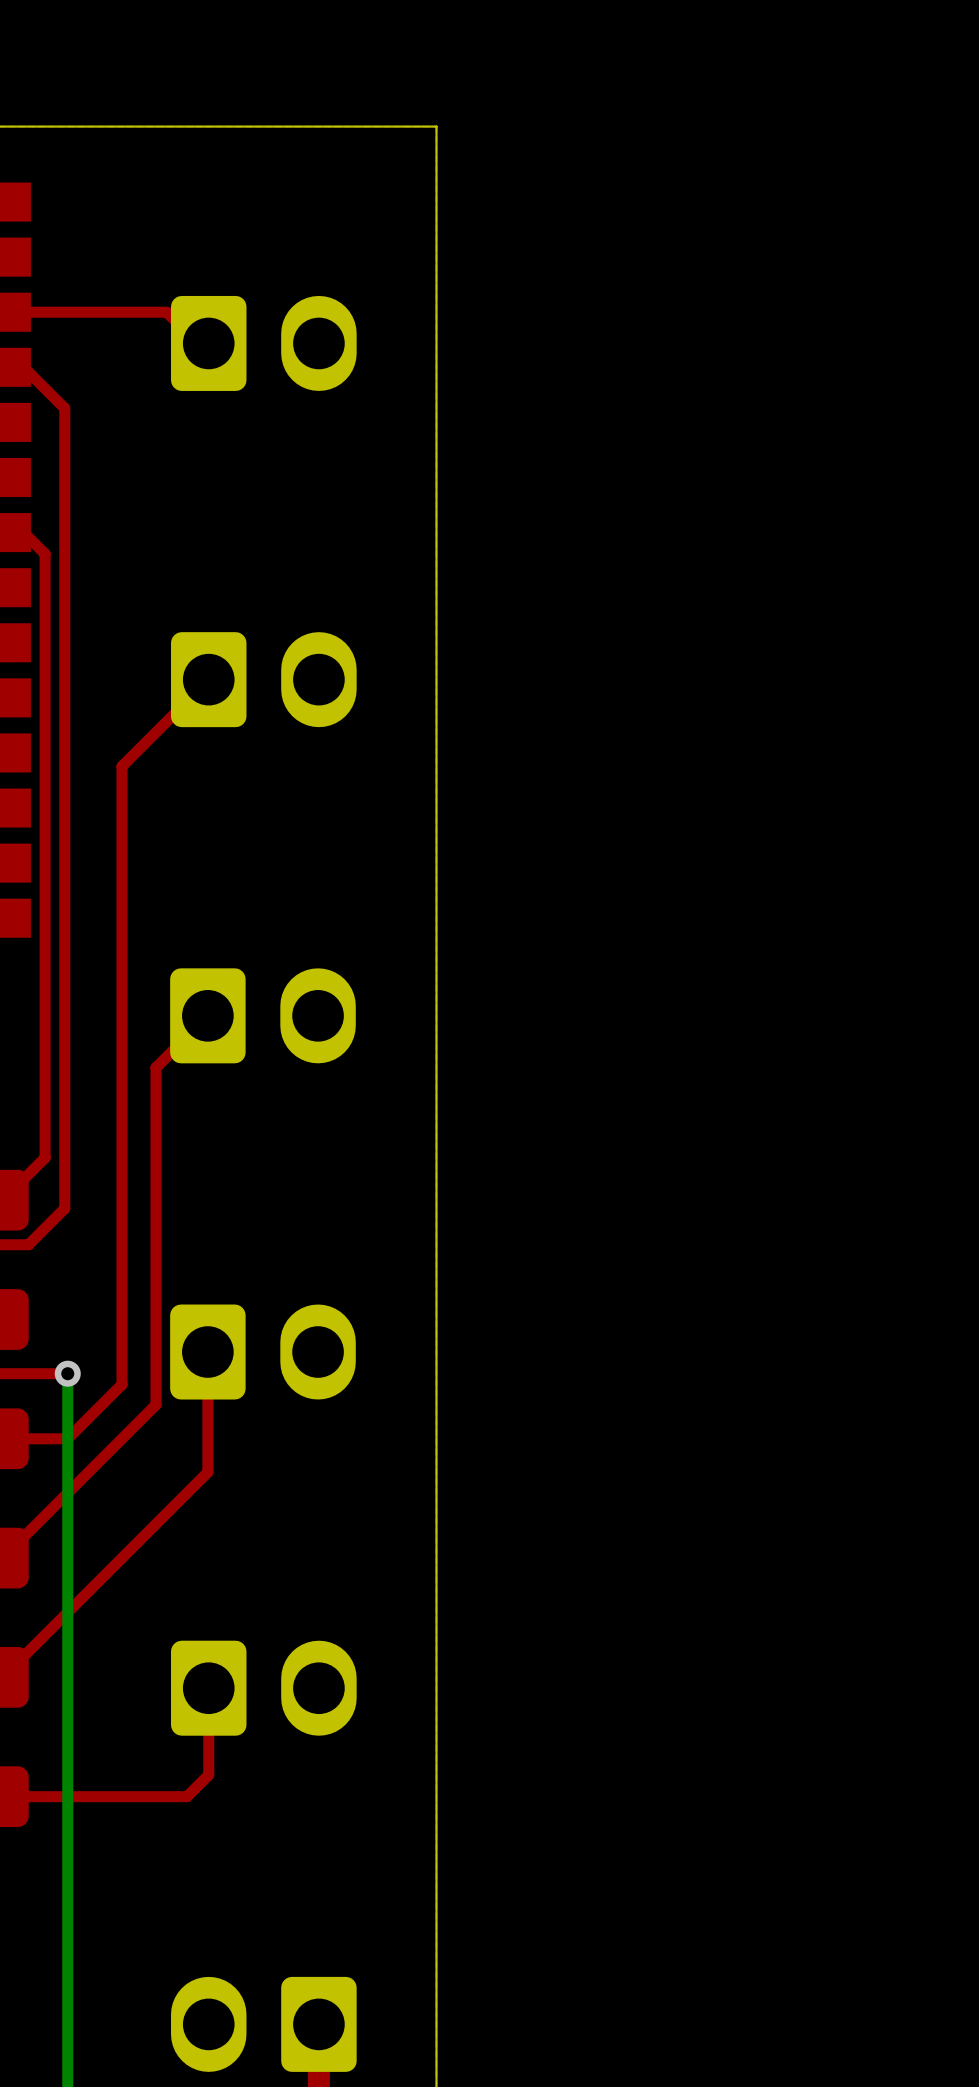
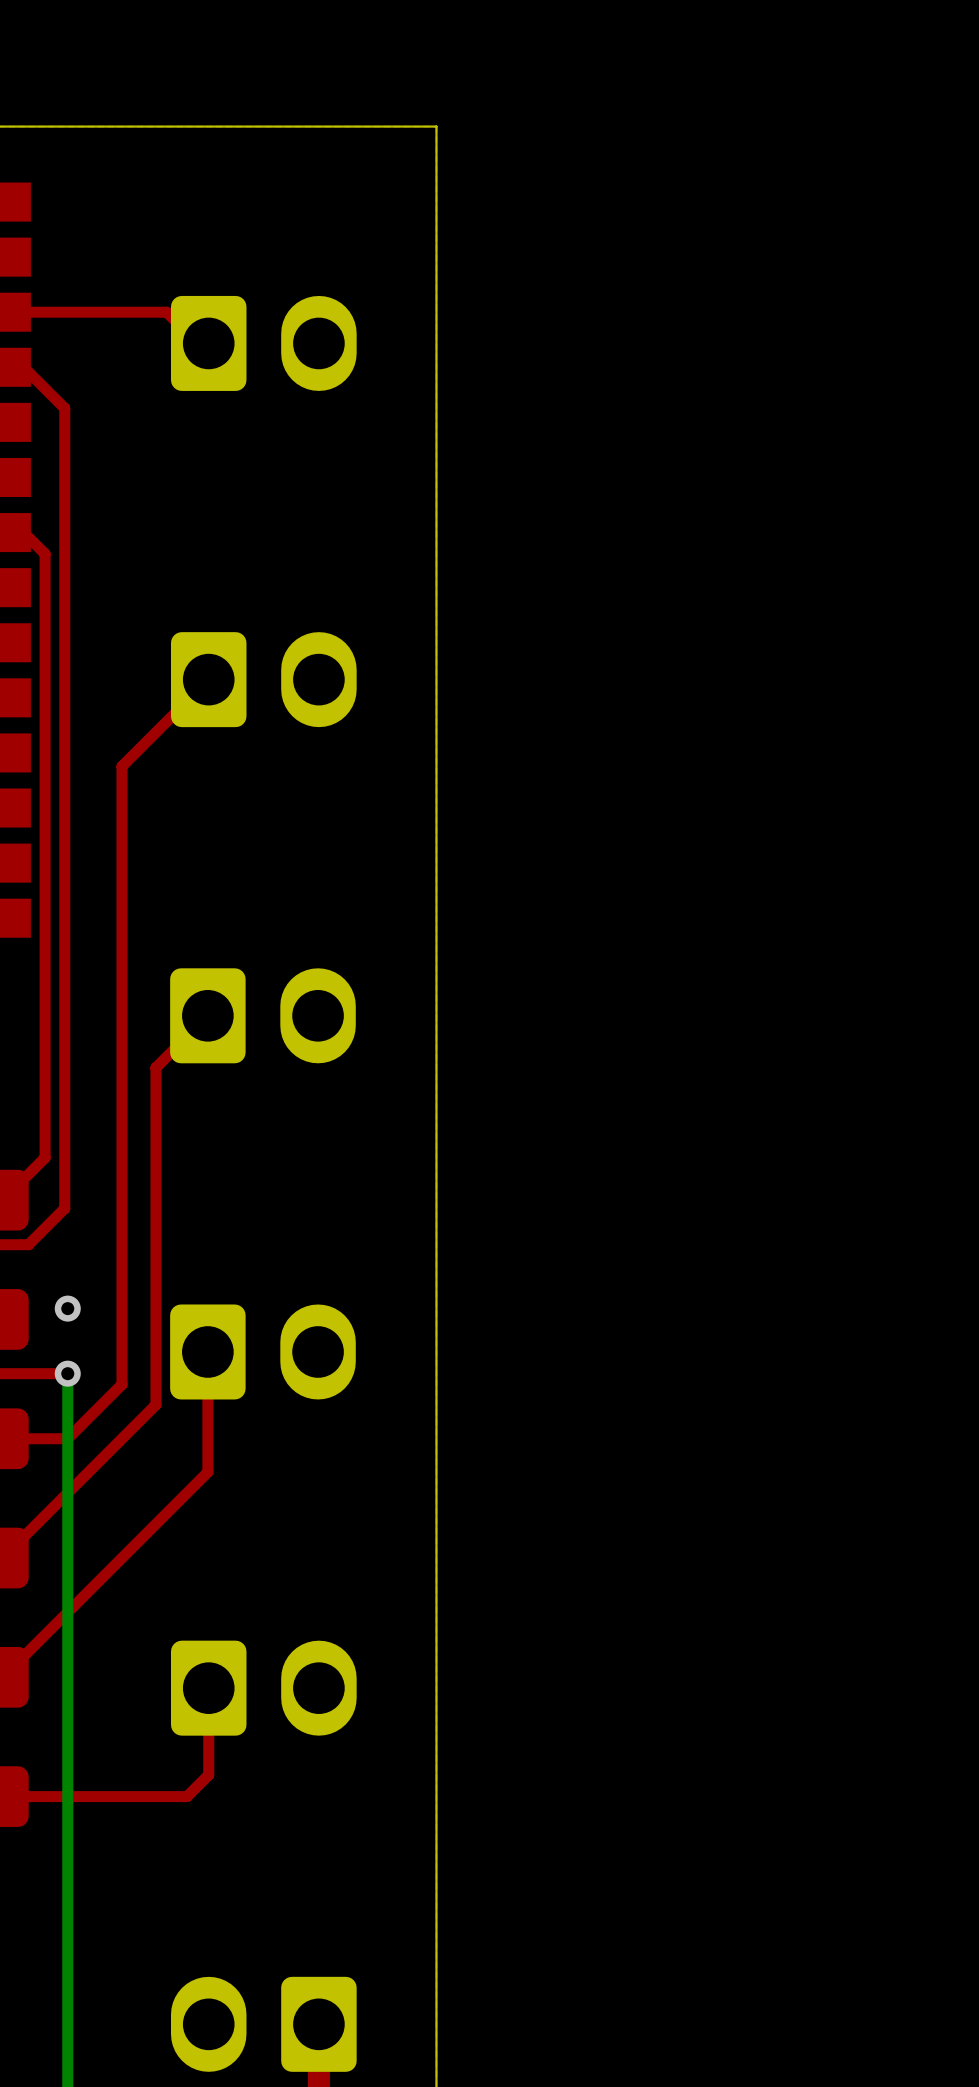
via: none -> (67, 1308)

